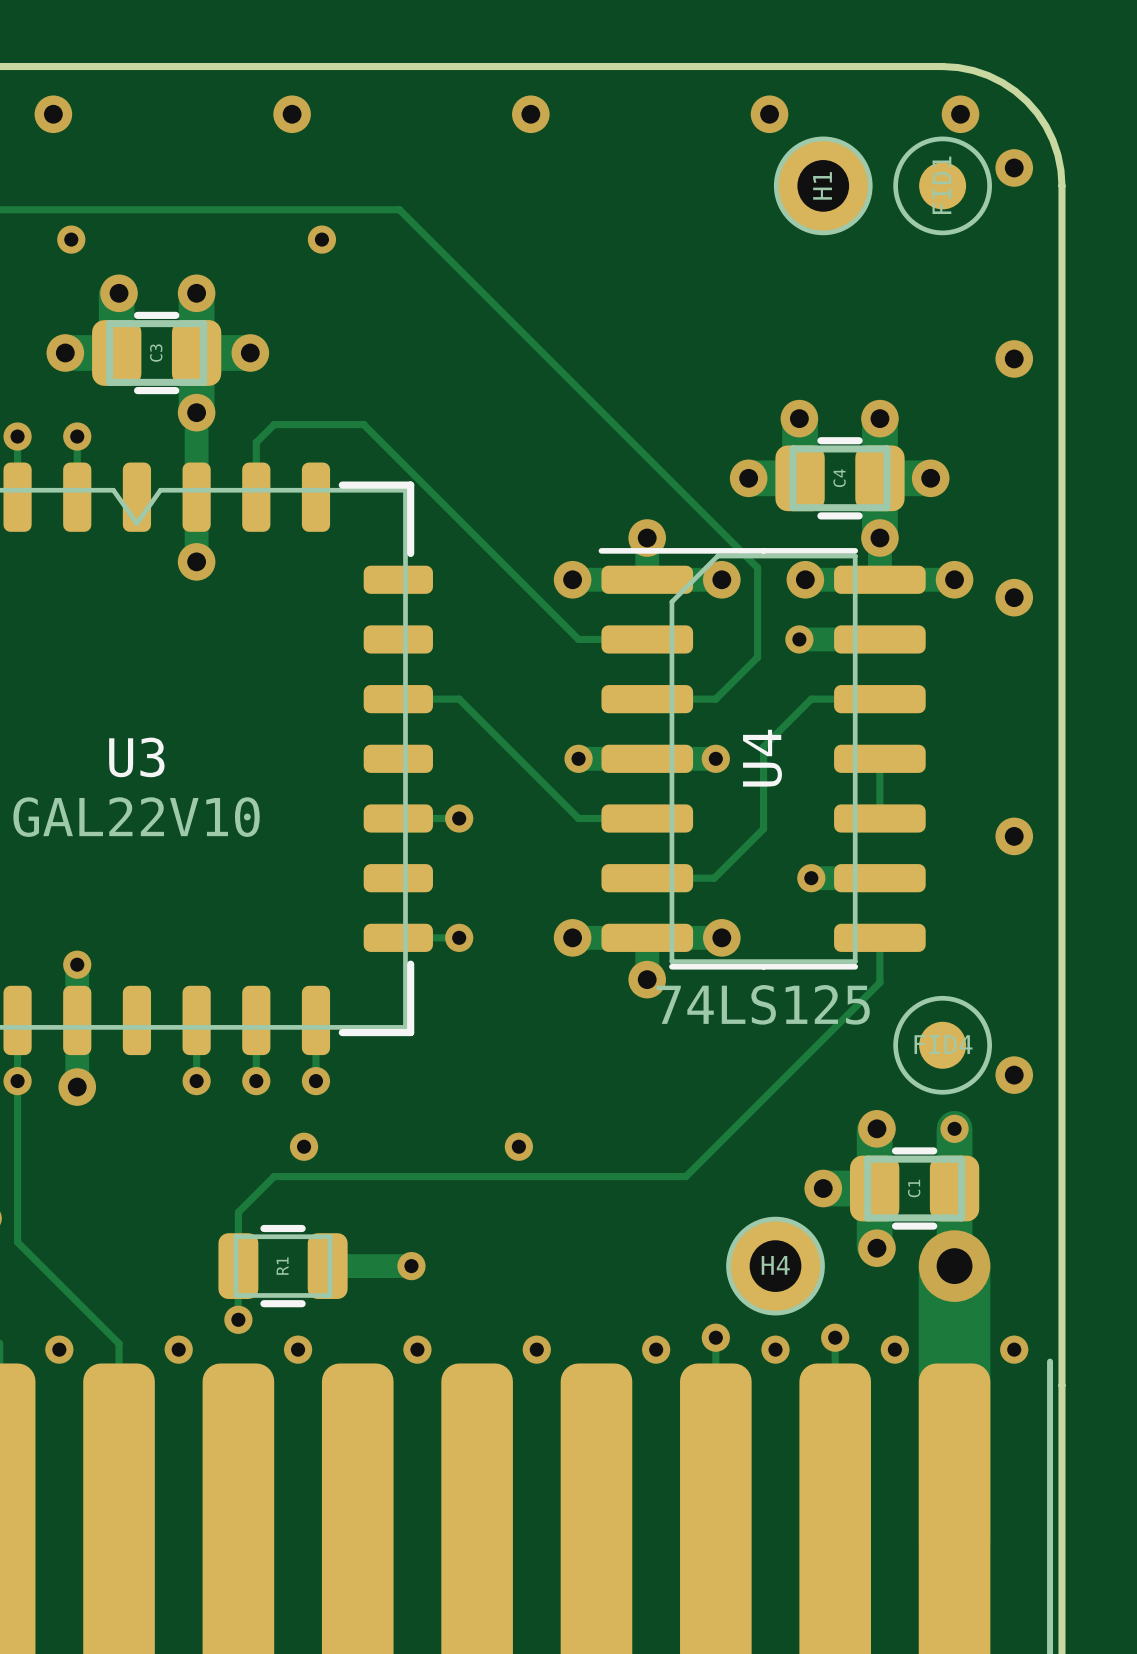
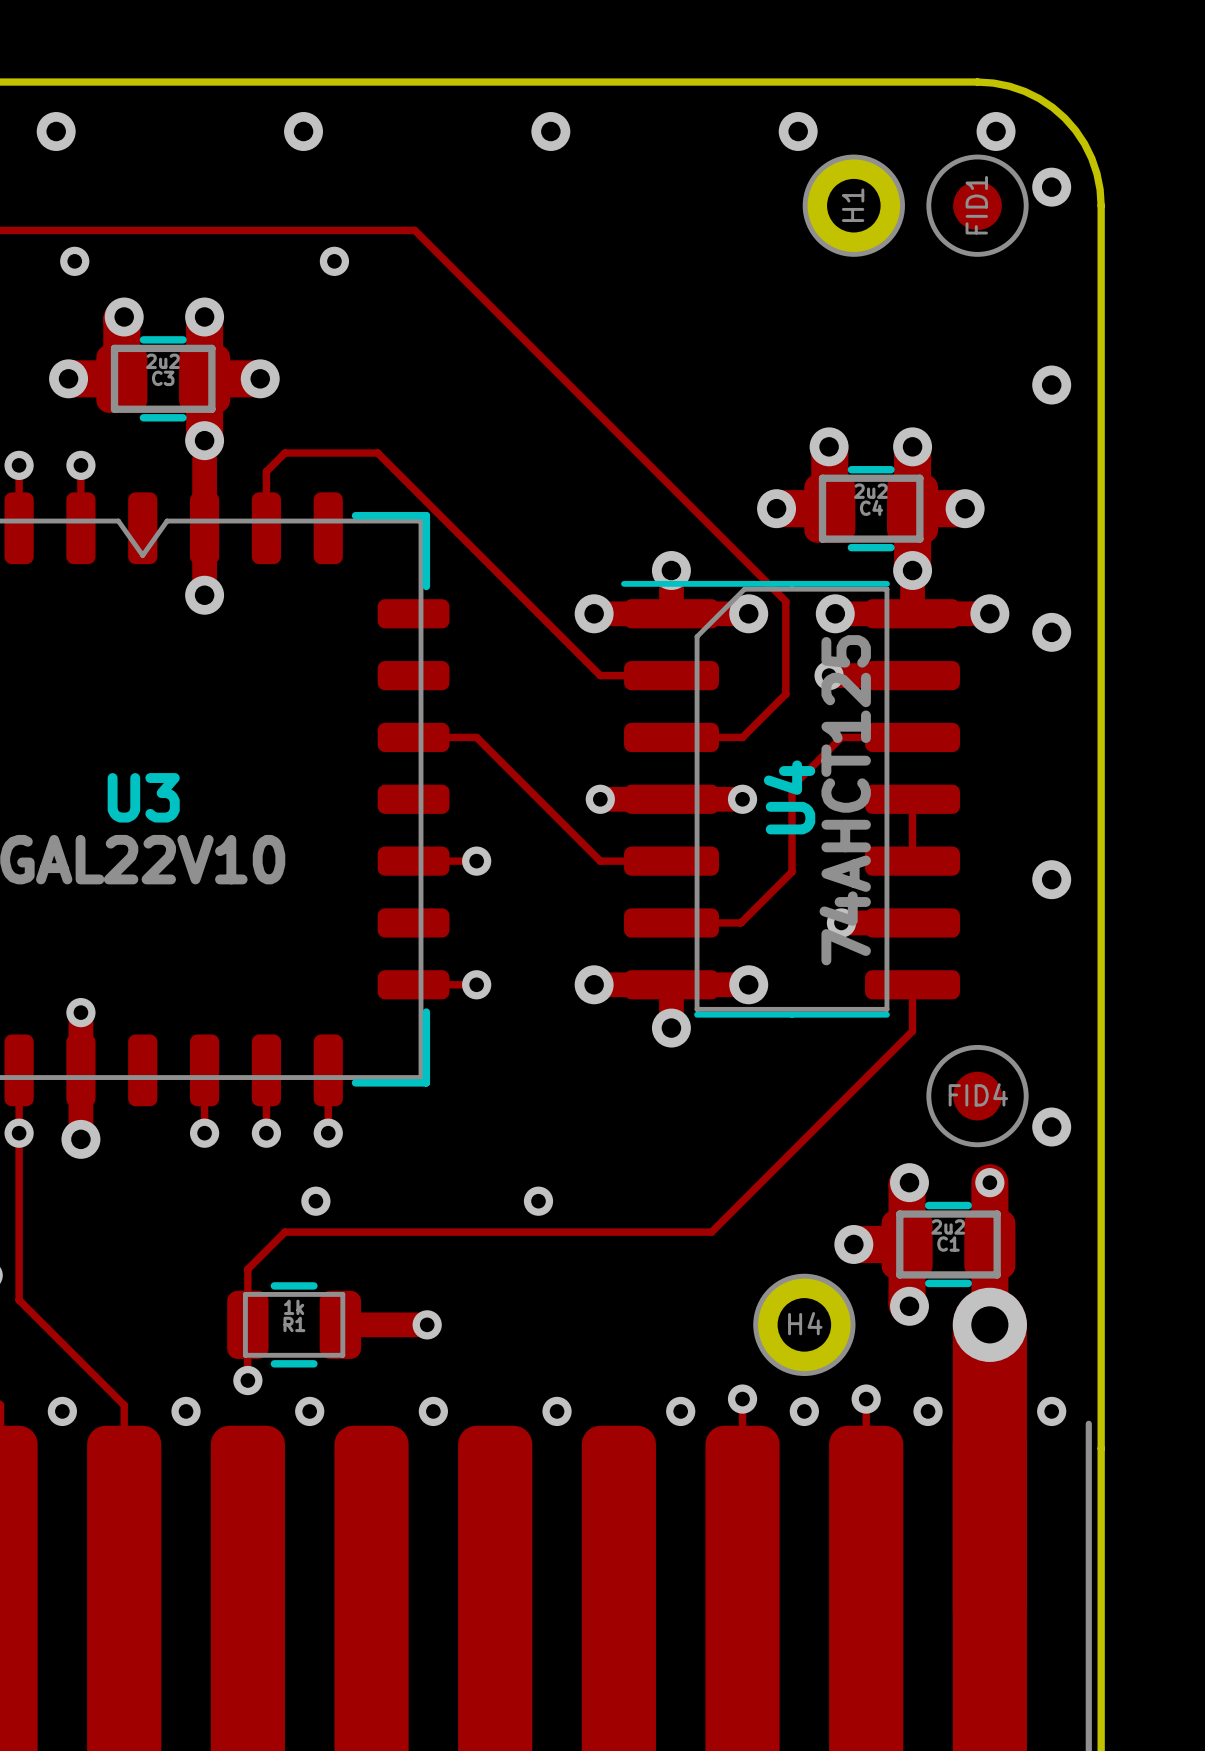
C3 value: none -> 2u2 (162, 361)
C3 name rotation: 0° (156, 353) -> 90° clockwise (163, 378)
C4 value: none -> 2u2 (870, 491)
C4 name rotation: 0° (839, 478) -> 90° clockwise (871, 507)
U4 value: 74LS125 (763, 1004) -> 74AHCT125 (845, 800)
C1 value: none -> 2u2 (948, 1226)
C1 name rotation: 0° (914, 1188) -> 90° clockwise (948, 1244)
R1 value: none -> 1k (294, 1307)
R1 name rotation: 0° (282, 1266) -> 90° clockwise (294, 1324)

